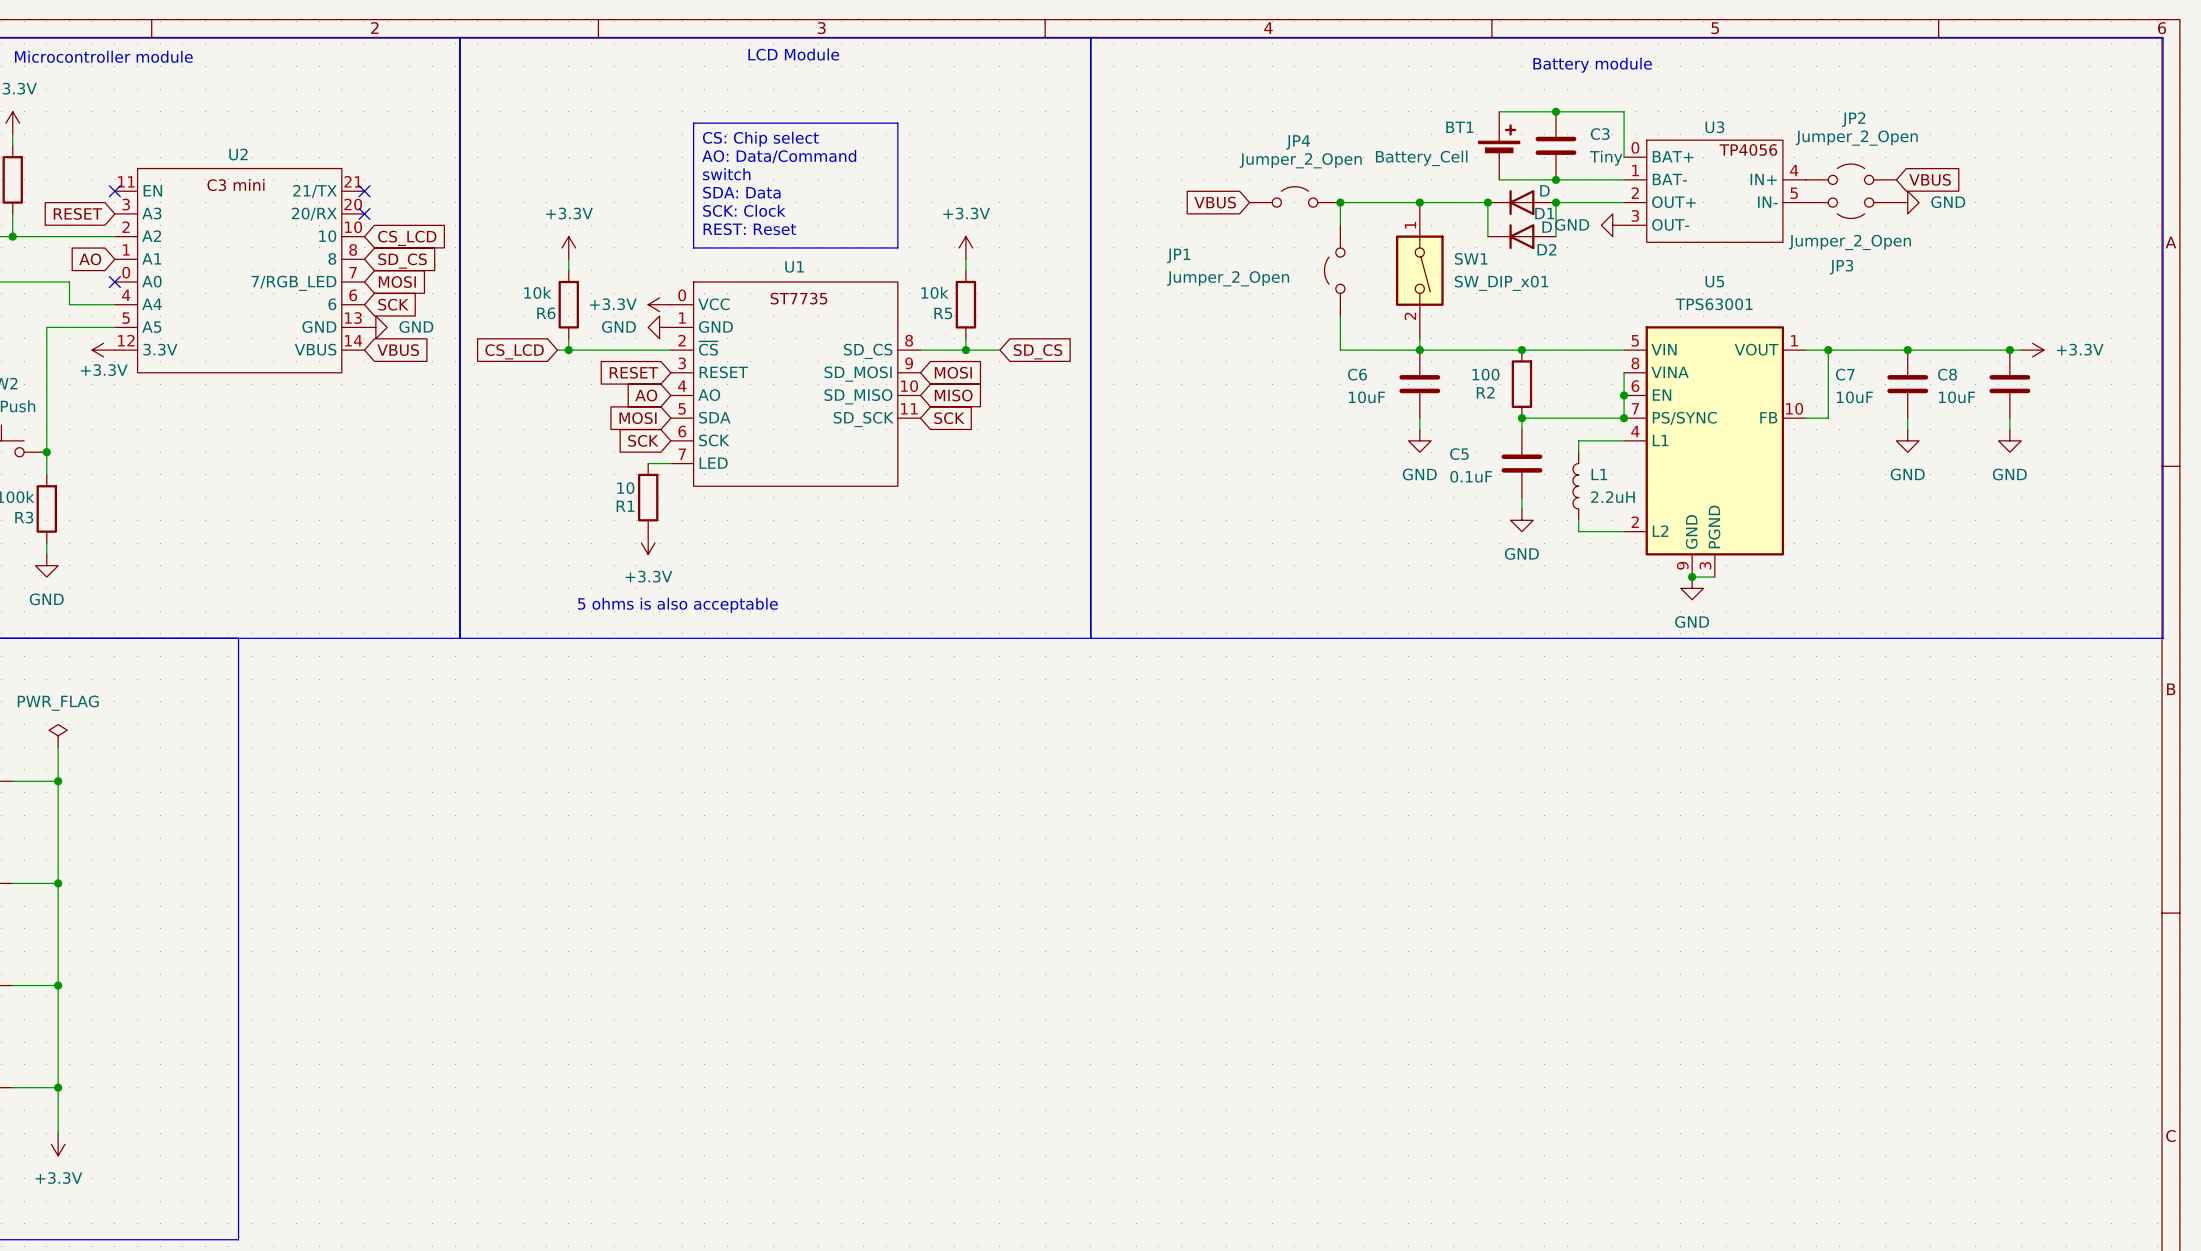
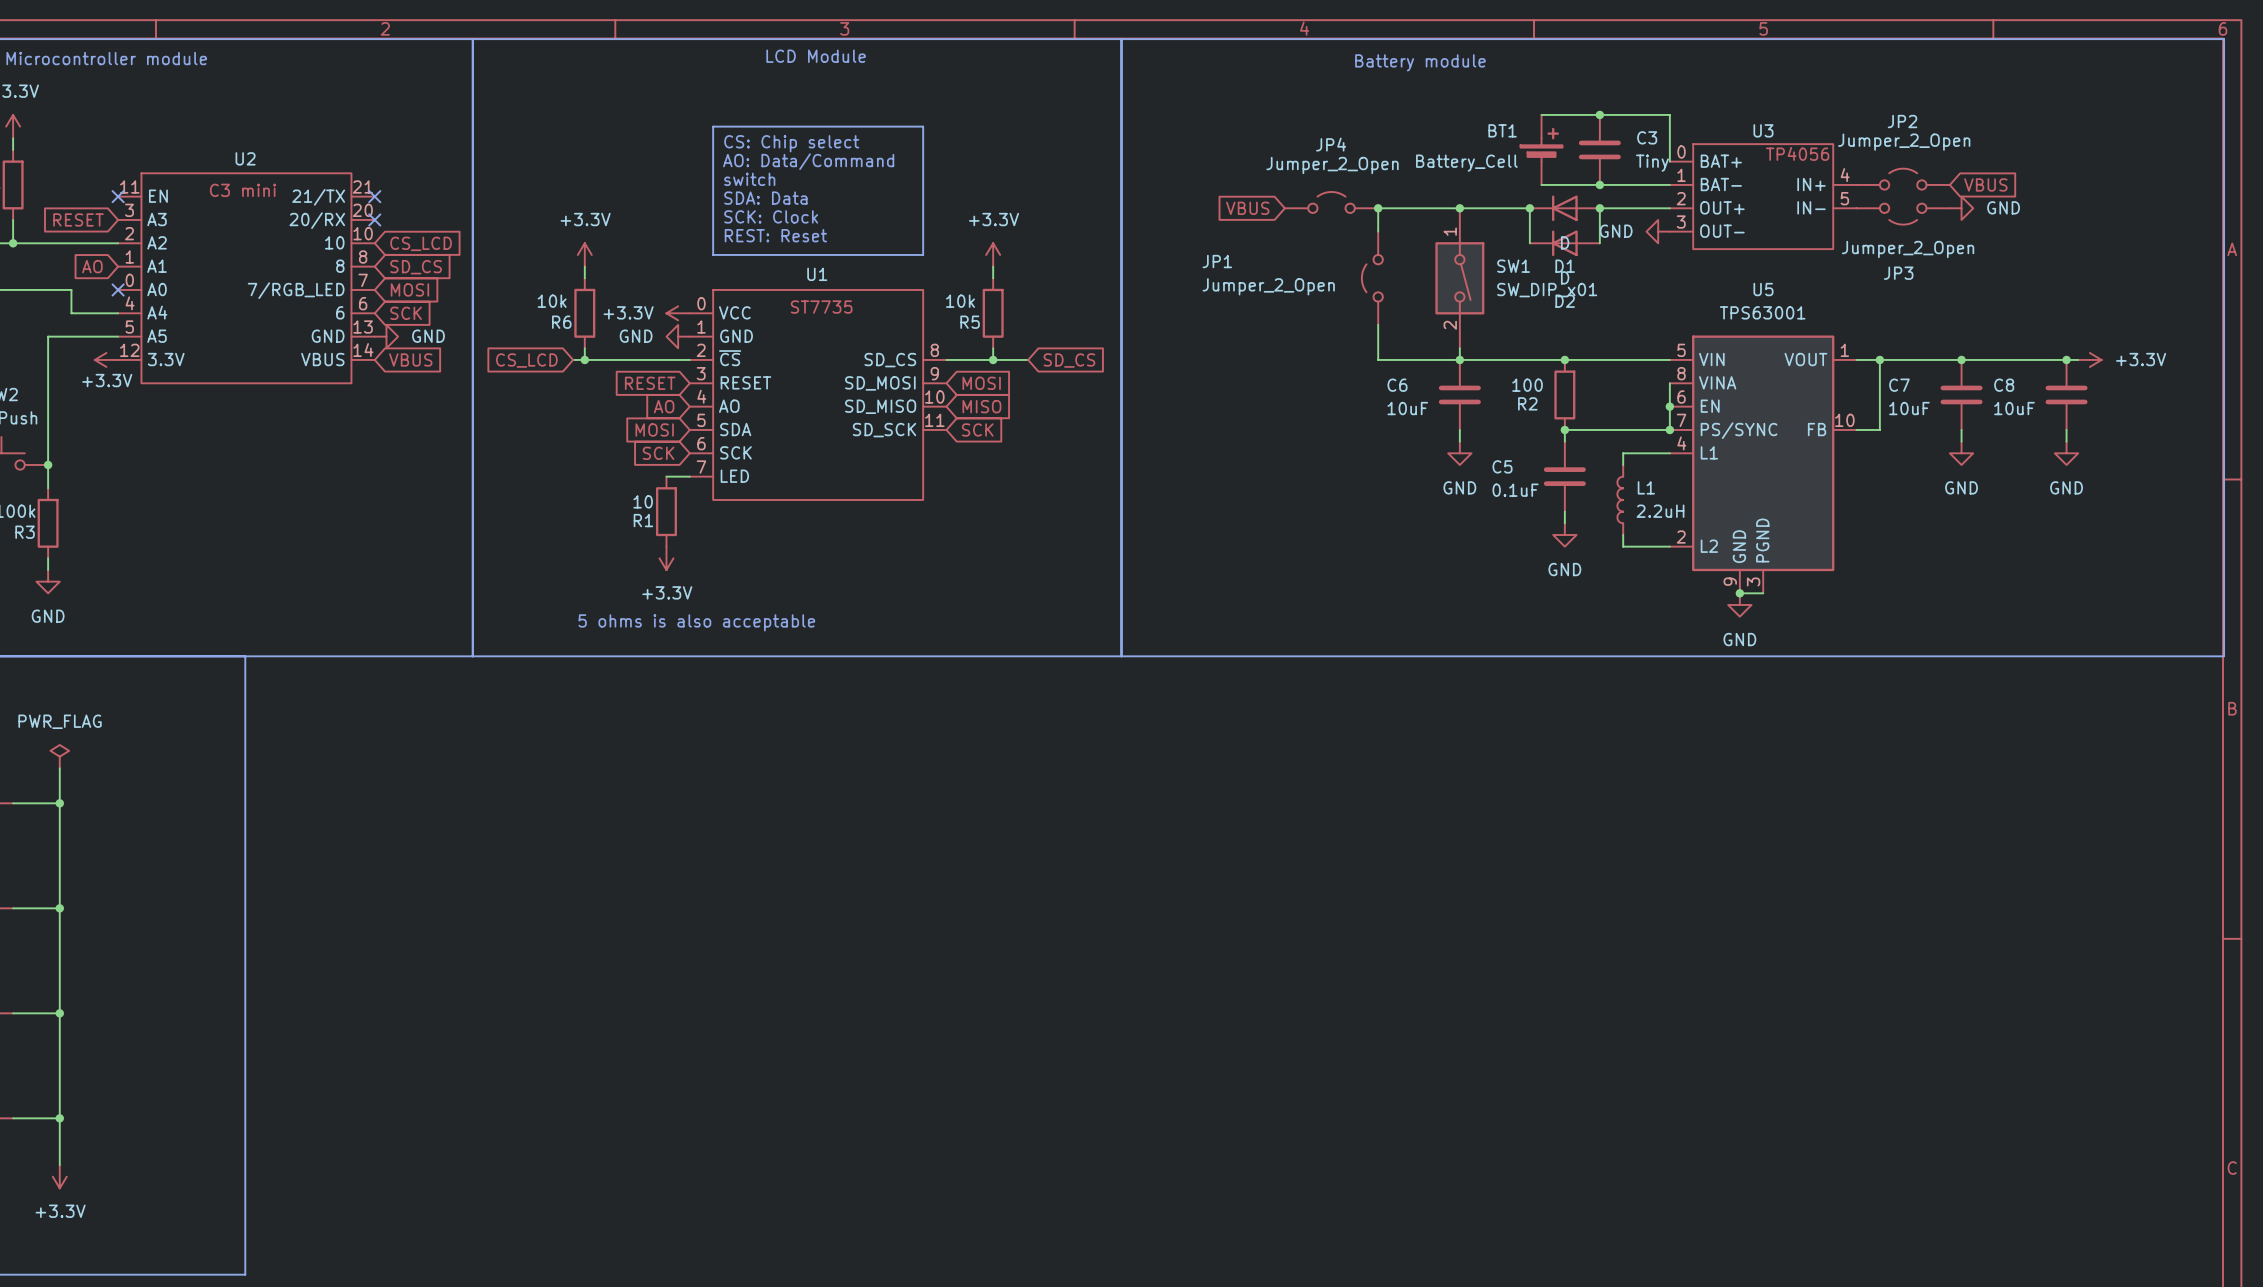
text position: Battery module (1592, 65) -> Battery module (1420, 62)
D1 value position: D (1544, 190) -> D (1565, 242)
D1 name position: D1 (1544, 213) -> D1 (1565, 266)
D2 value position: D (1547, 227) -> D (1565, 277)
D2 name position: D2 (1546, 249) -> D2 (1565, 301)

